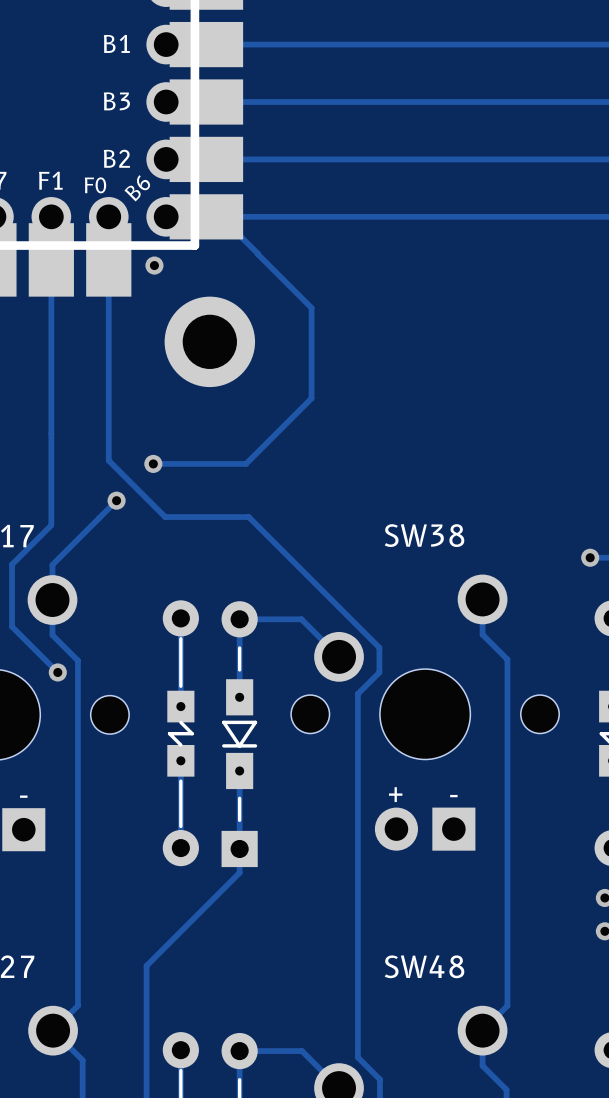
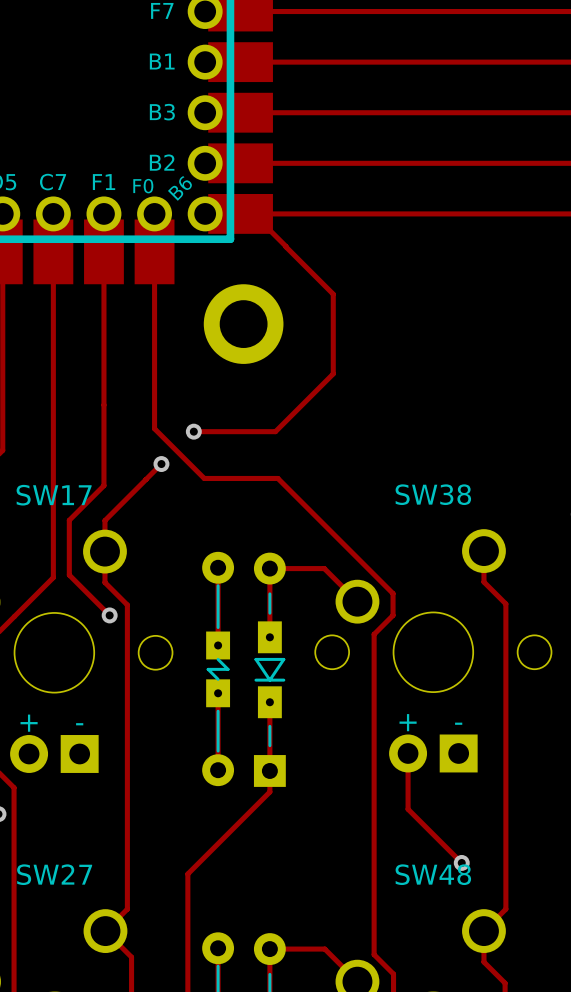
via: (154, 265) -> none
track: none -> (408, 753) (408, 809) (461, 862)
via: none -> (461, 862)

